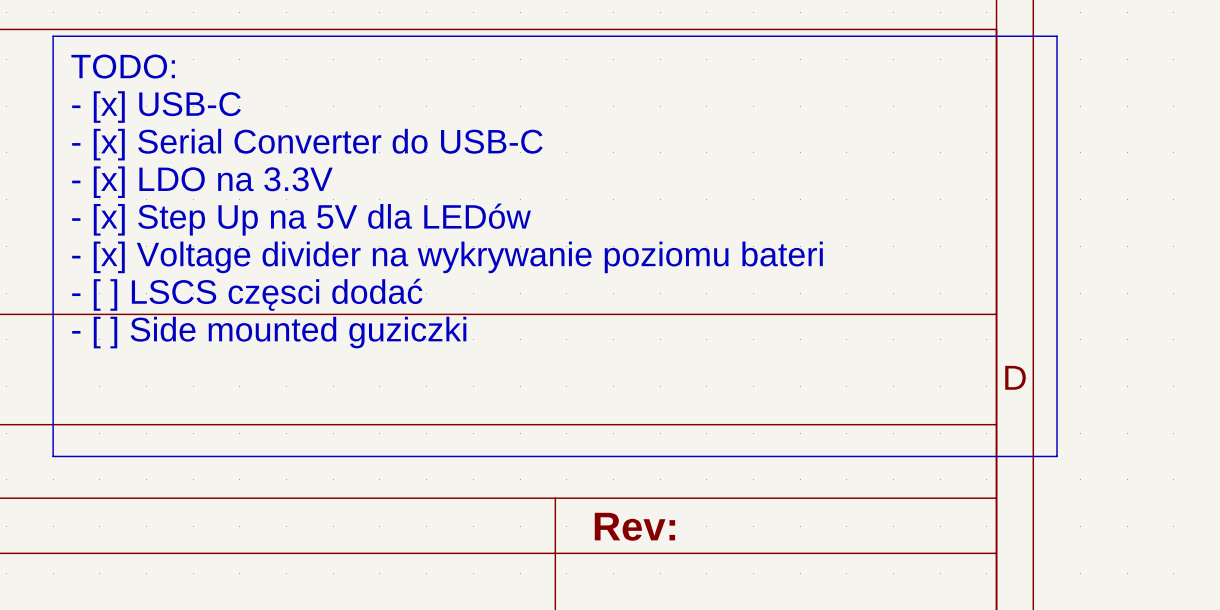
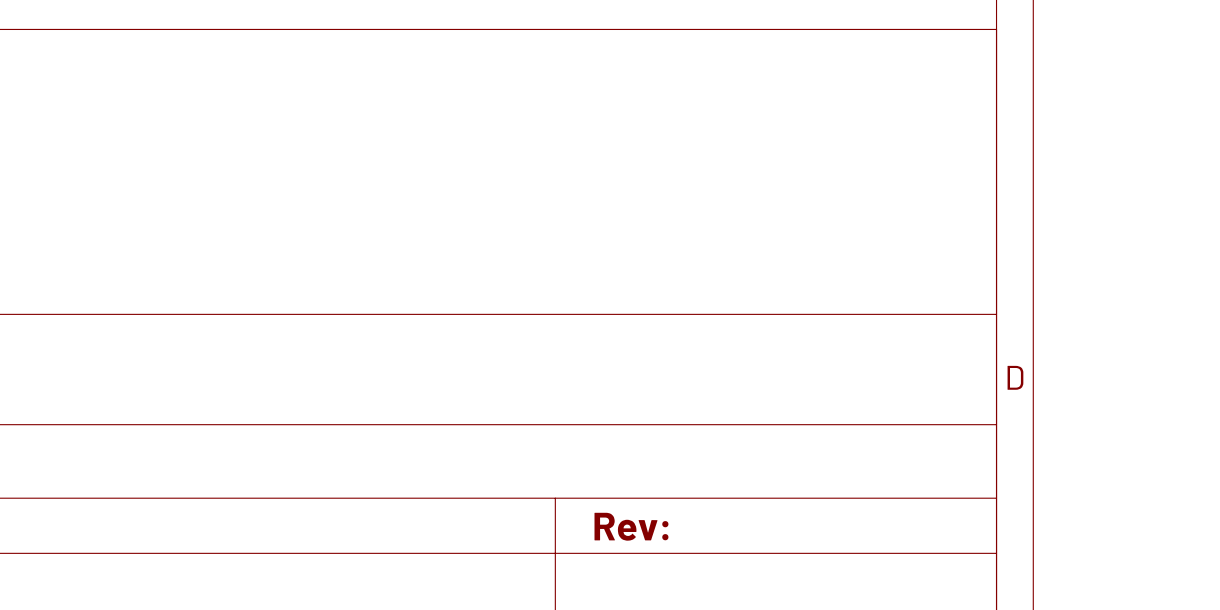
line: (53, 36) (1057, 36) (1057, 456) (53, 456) (53, 36) -> none
text: TODO: (123, 66) -> none
text: - [x] USB-C (156, 107) -> none
text: - [x] Serial Converter do USB-C (307, 144) -> none
text: - [x] LDO na 3.3V (202, 182) -> none
text: - [x] Step Up na 5V dla LEDów (301, 219) -> none
text: - [x] Voltage divider na wykrywanie poziomu bateri (447, 257) -> none
text: - [ ] LSCS częsci dodać (247, 294) -> none
text: - [ ] Side mounted guziczki (269, 332) -> none

